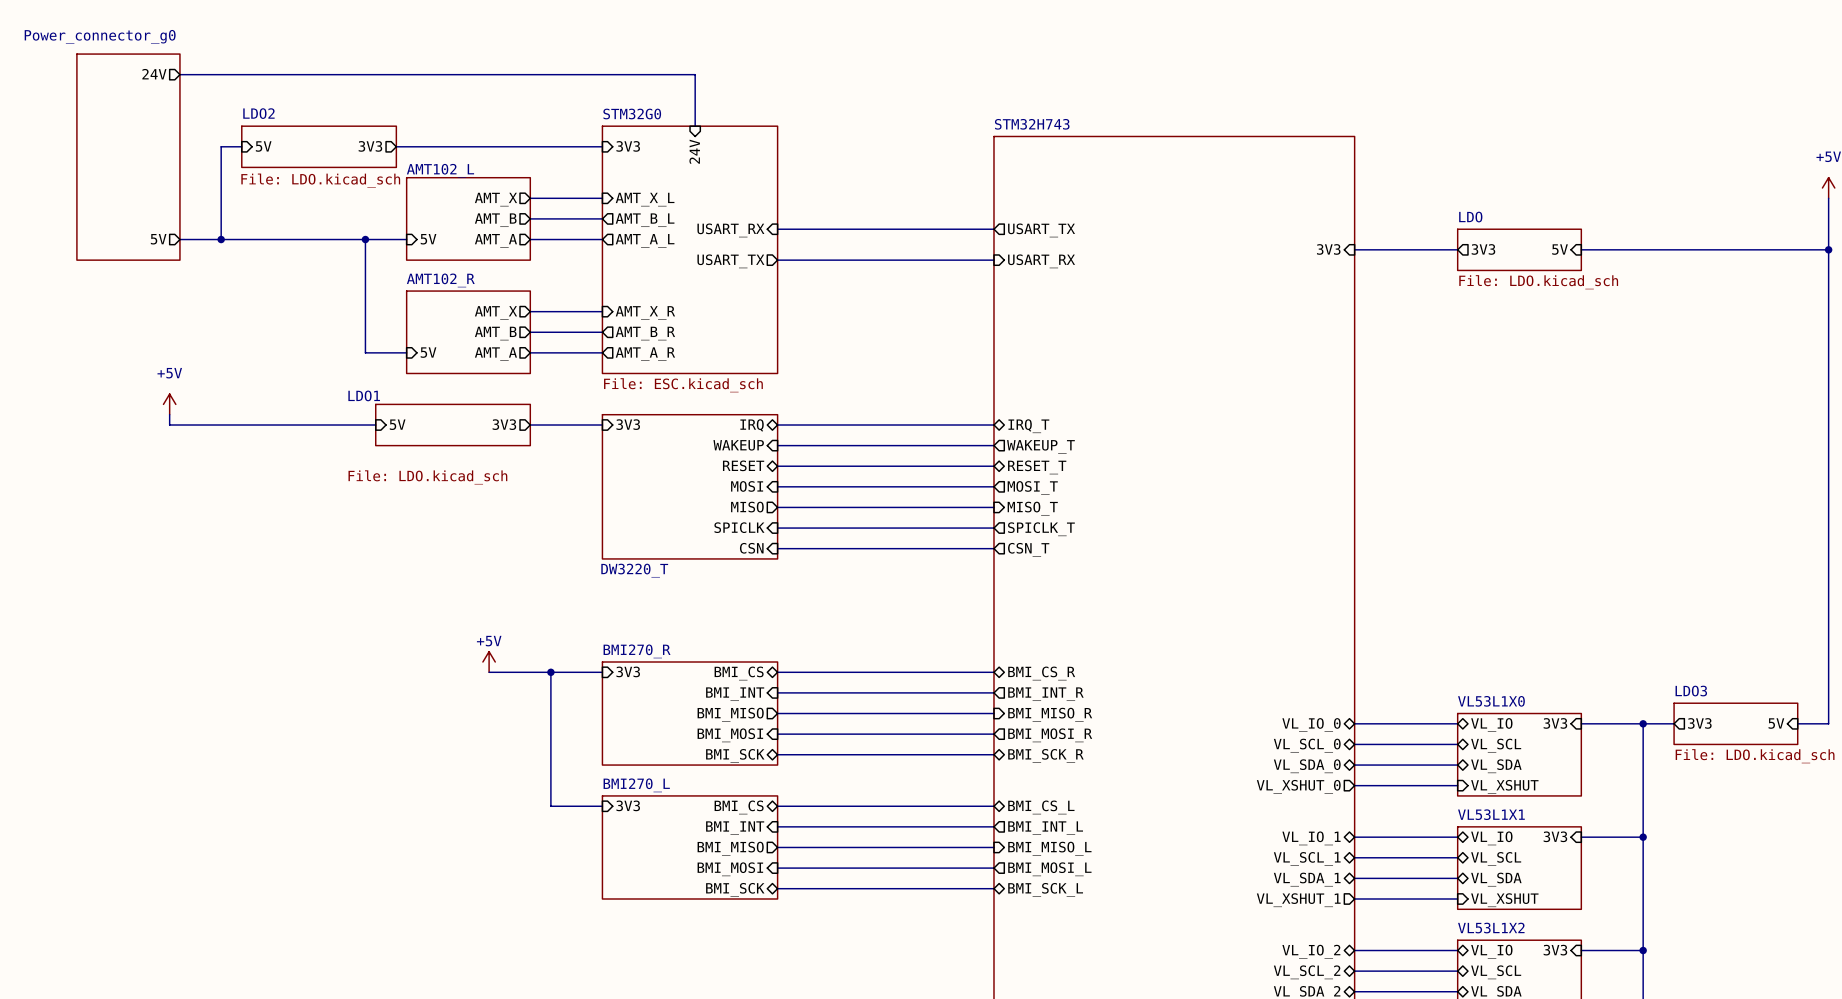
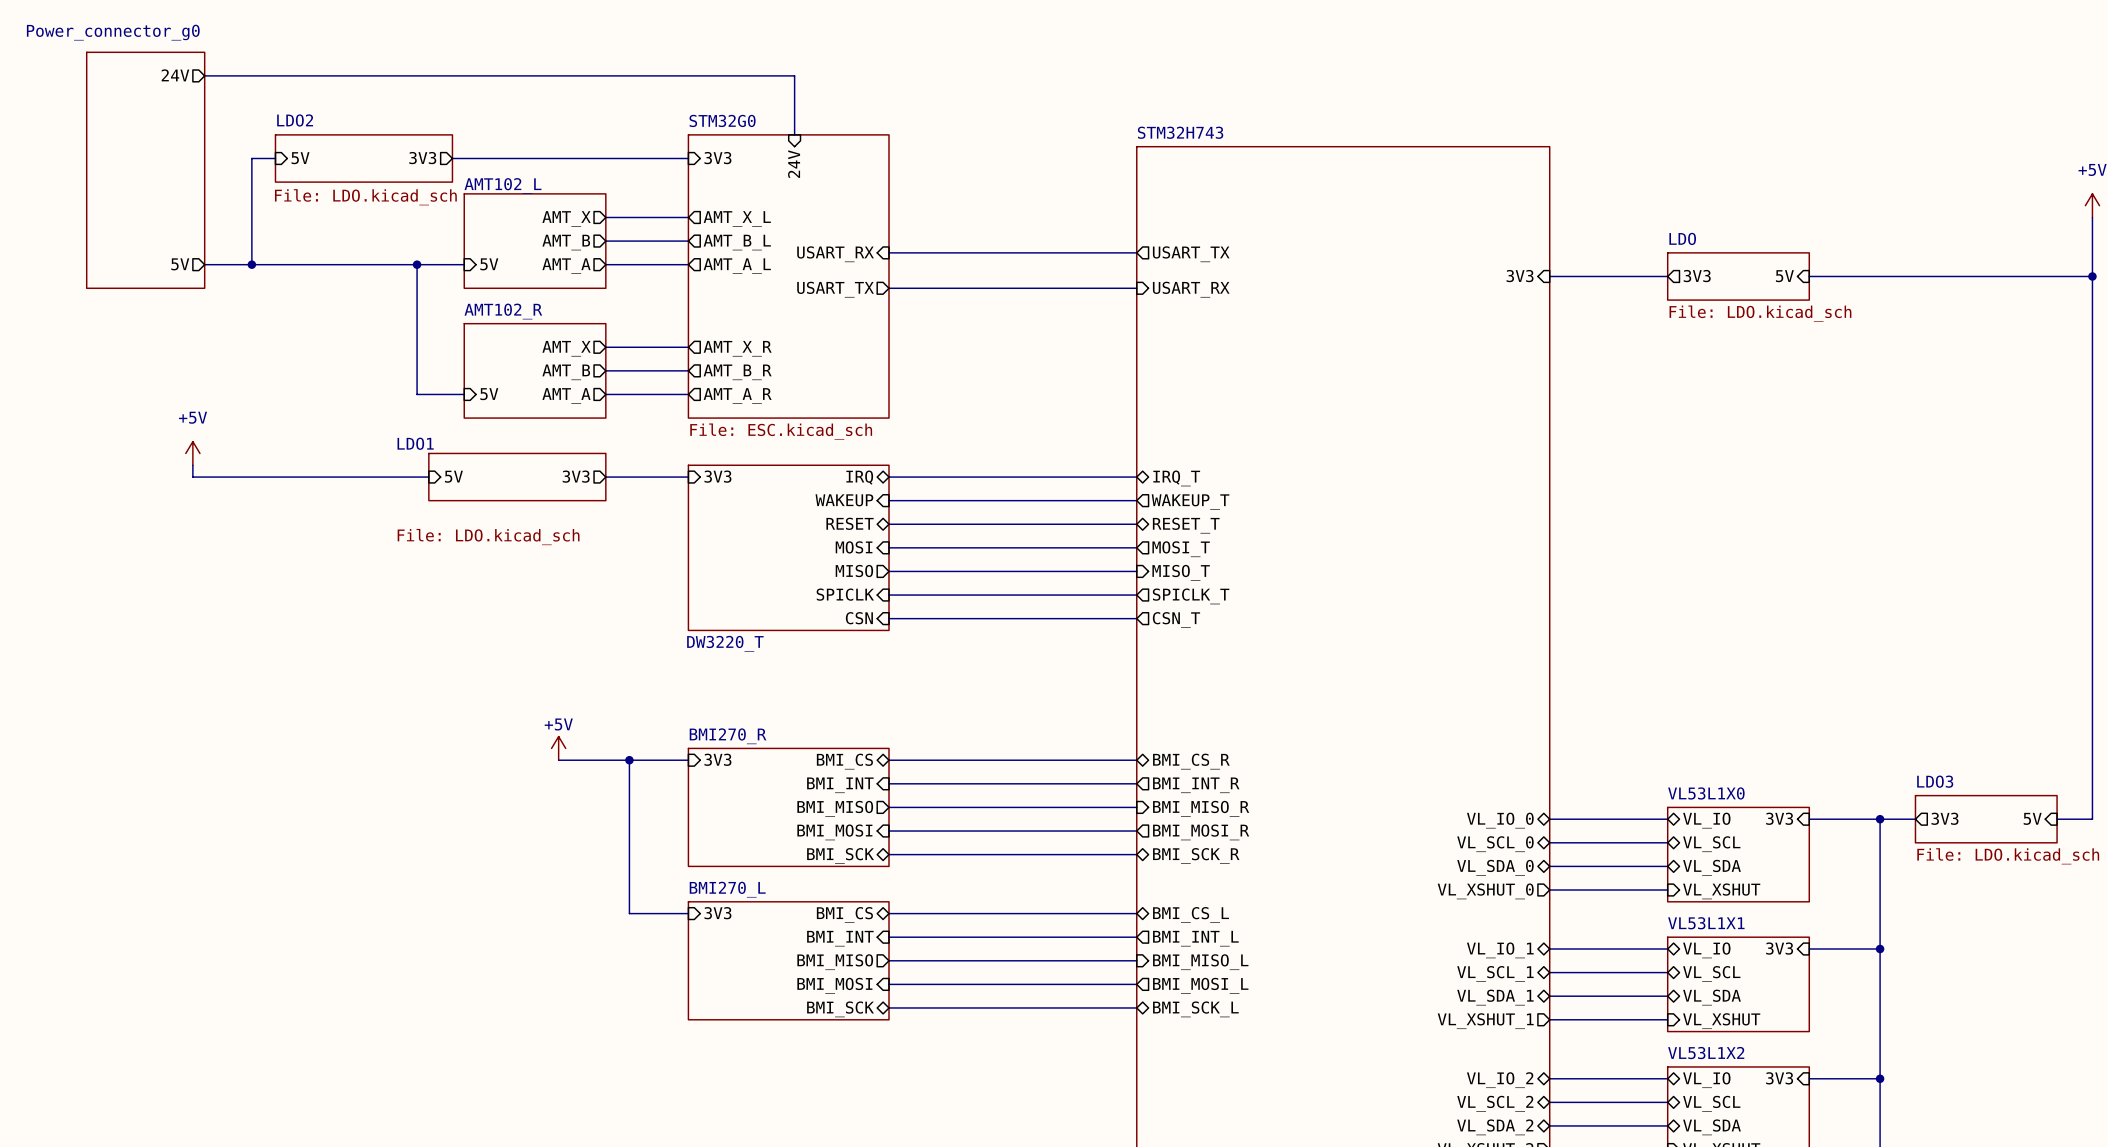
sheet pin shape: input (645, 199) -> output (737, 218)
sheet pin shape: input (645, 312) -> output (737, 348)

